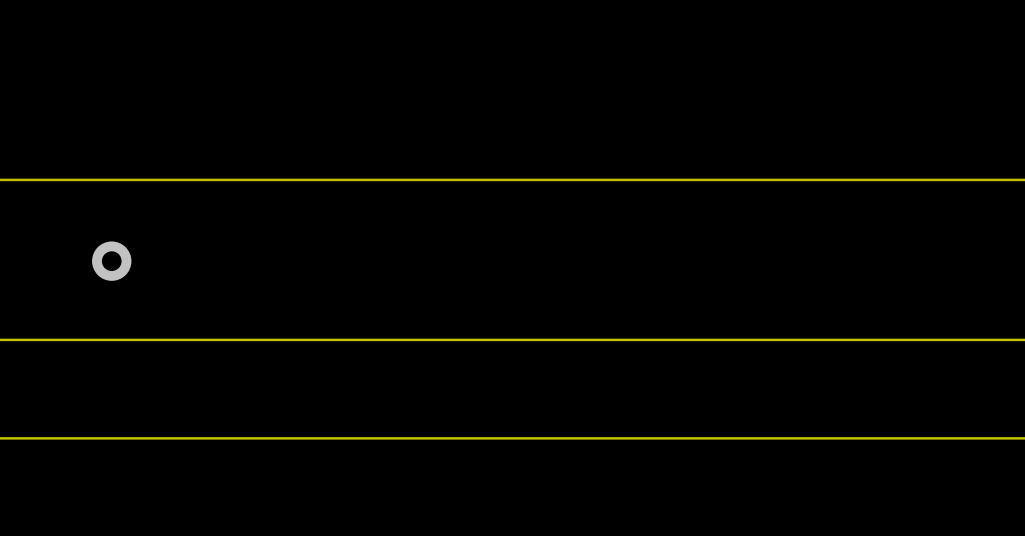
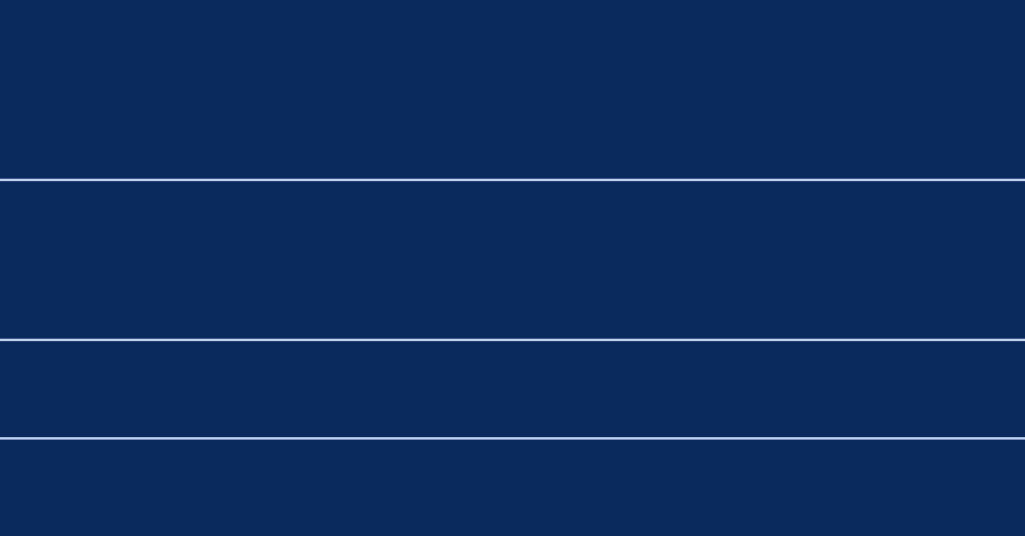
via: (111, 261) -> none

